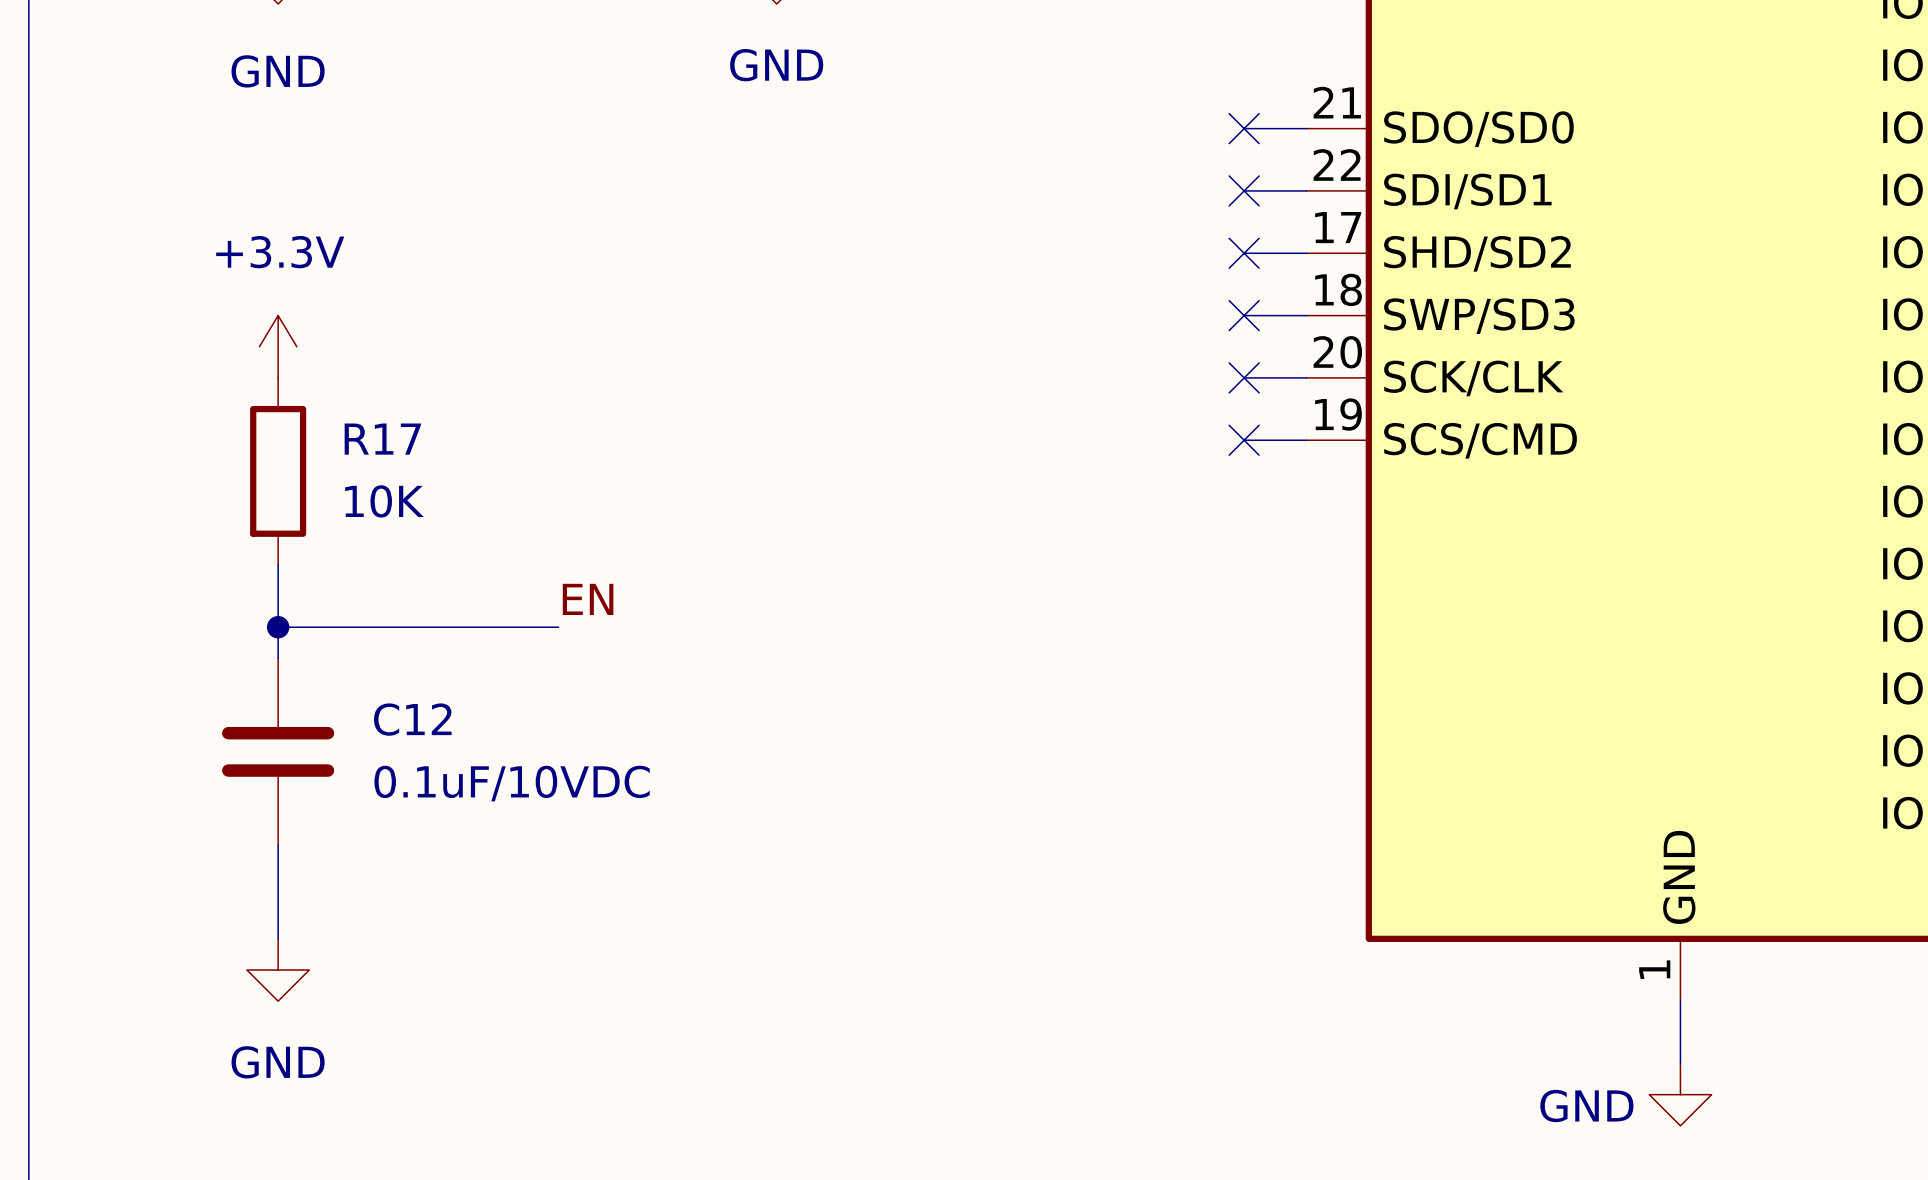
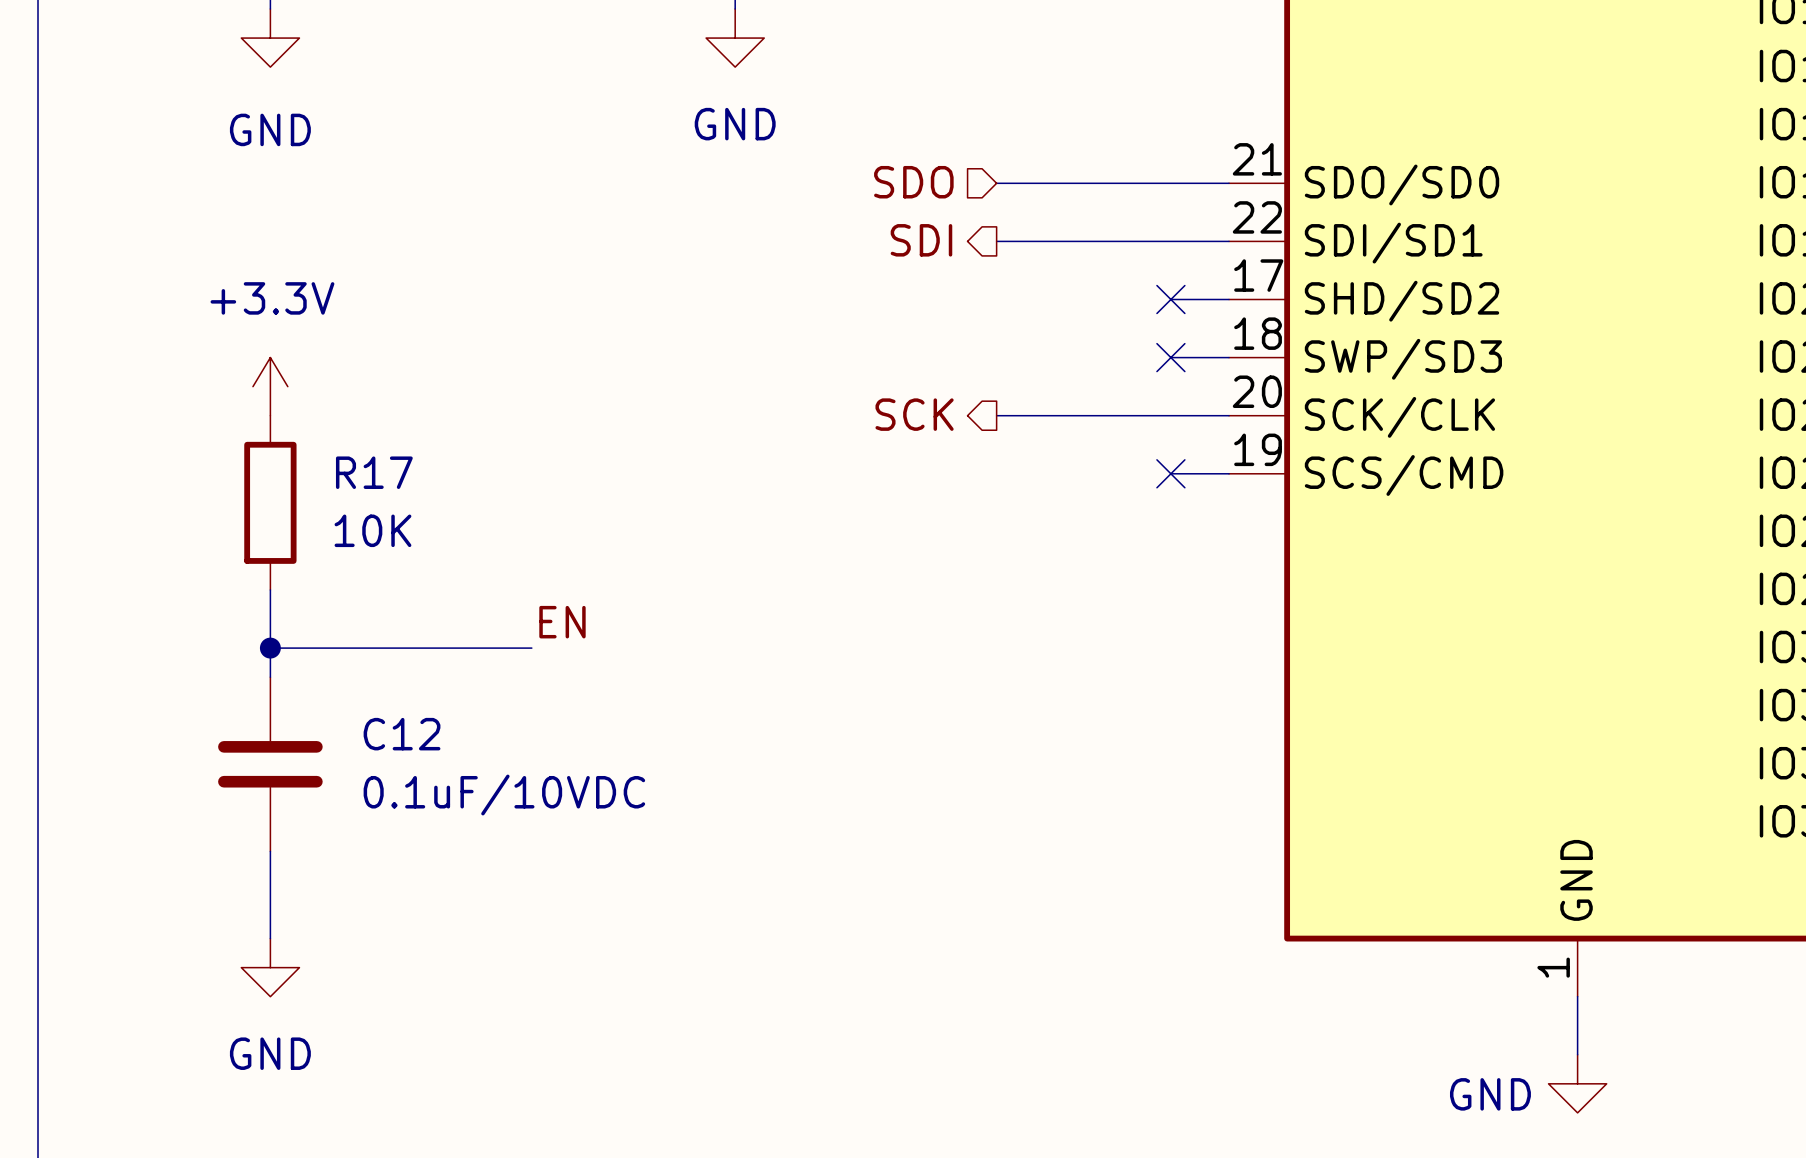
hierarchical label: none -> SDO (913, 182)
wire: none -> (996, 183) (1170, 183)
no-connect mark: (1244, 128) -> none
hierarchical label: none -> SDI (921, 240)
wire: none -> (996, 241) (1170, 241)
no-connect mark: (1244, 190) -> none
hierarchical label: none -> SCK (914, 414)
wire: none -> (996, 415) (1170, 415)
no-connect mark: (1244, 377) -> none

